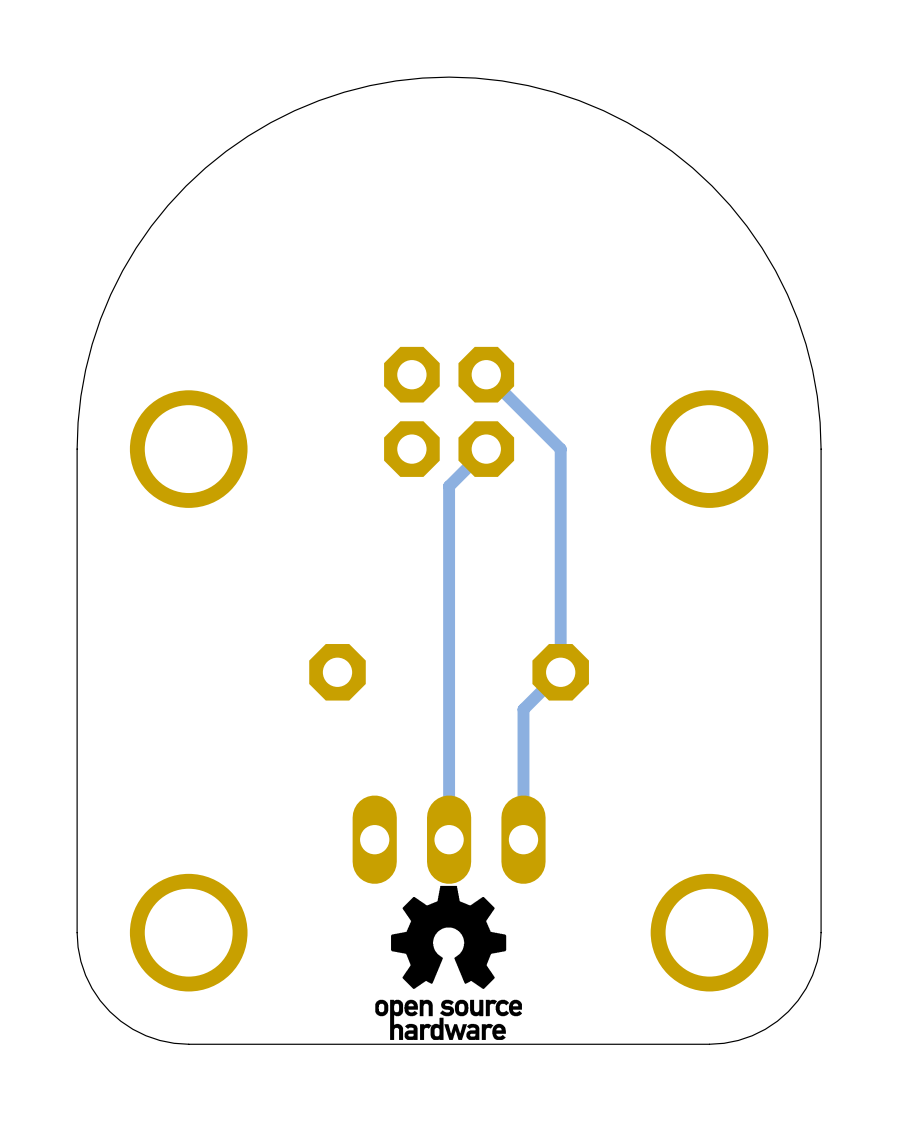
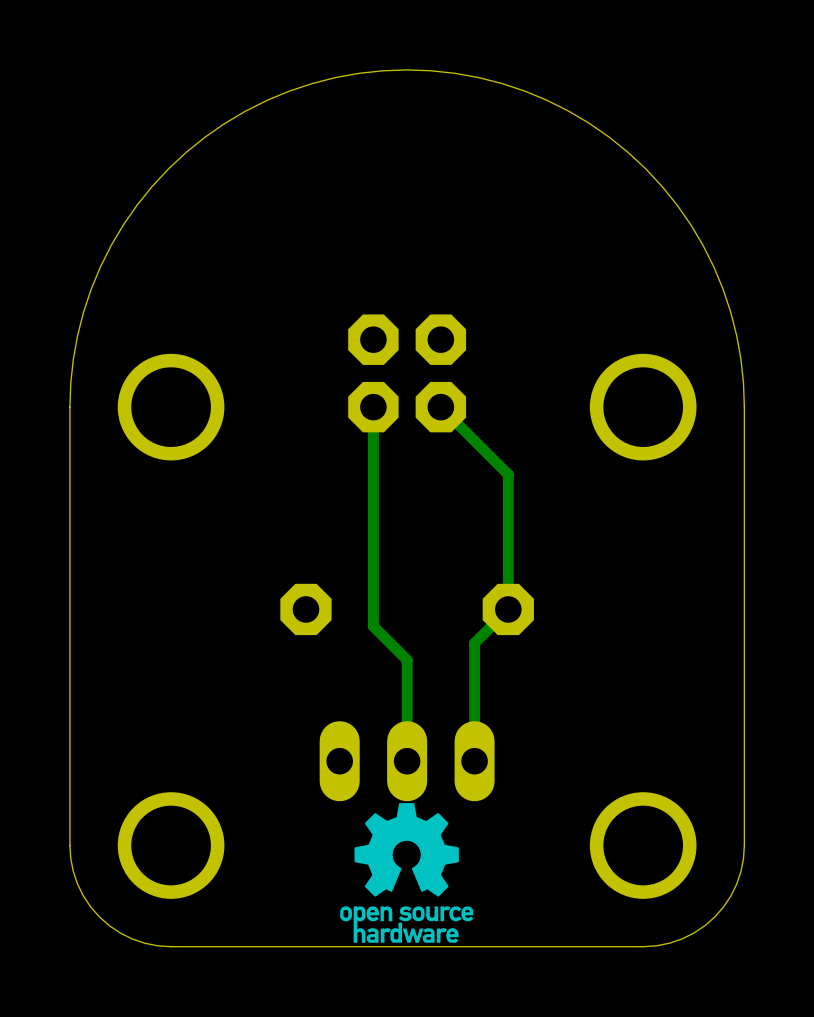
bottom track: (486, 374) (560, 449) (560, 523) -> (440, 407) (508, 474)
bottom track: (486, 449) (449, 486) (449, 728) -> (373, 407) (373, 626) (407, 660)

